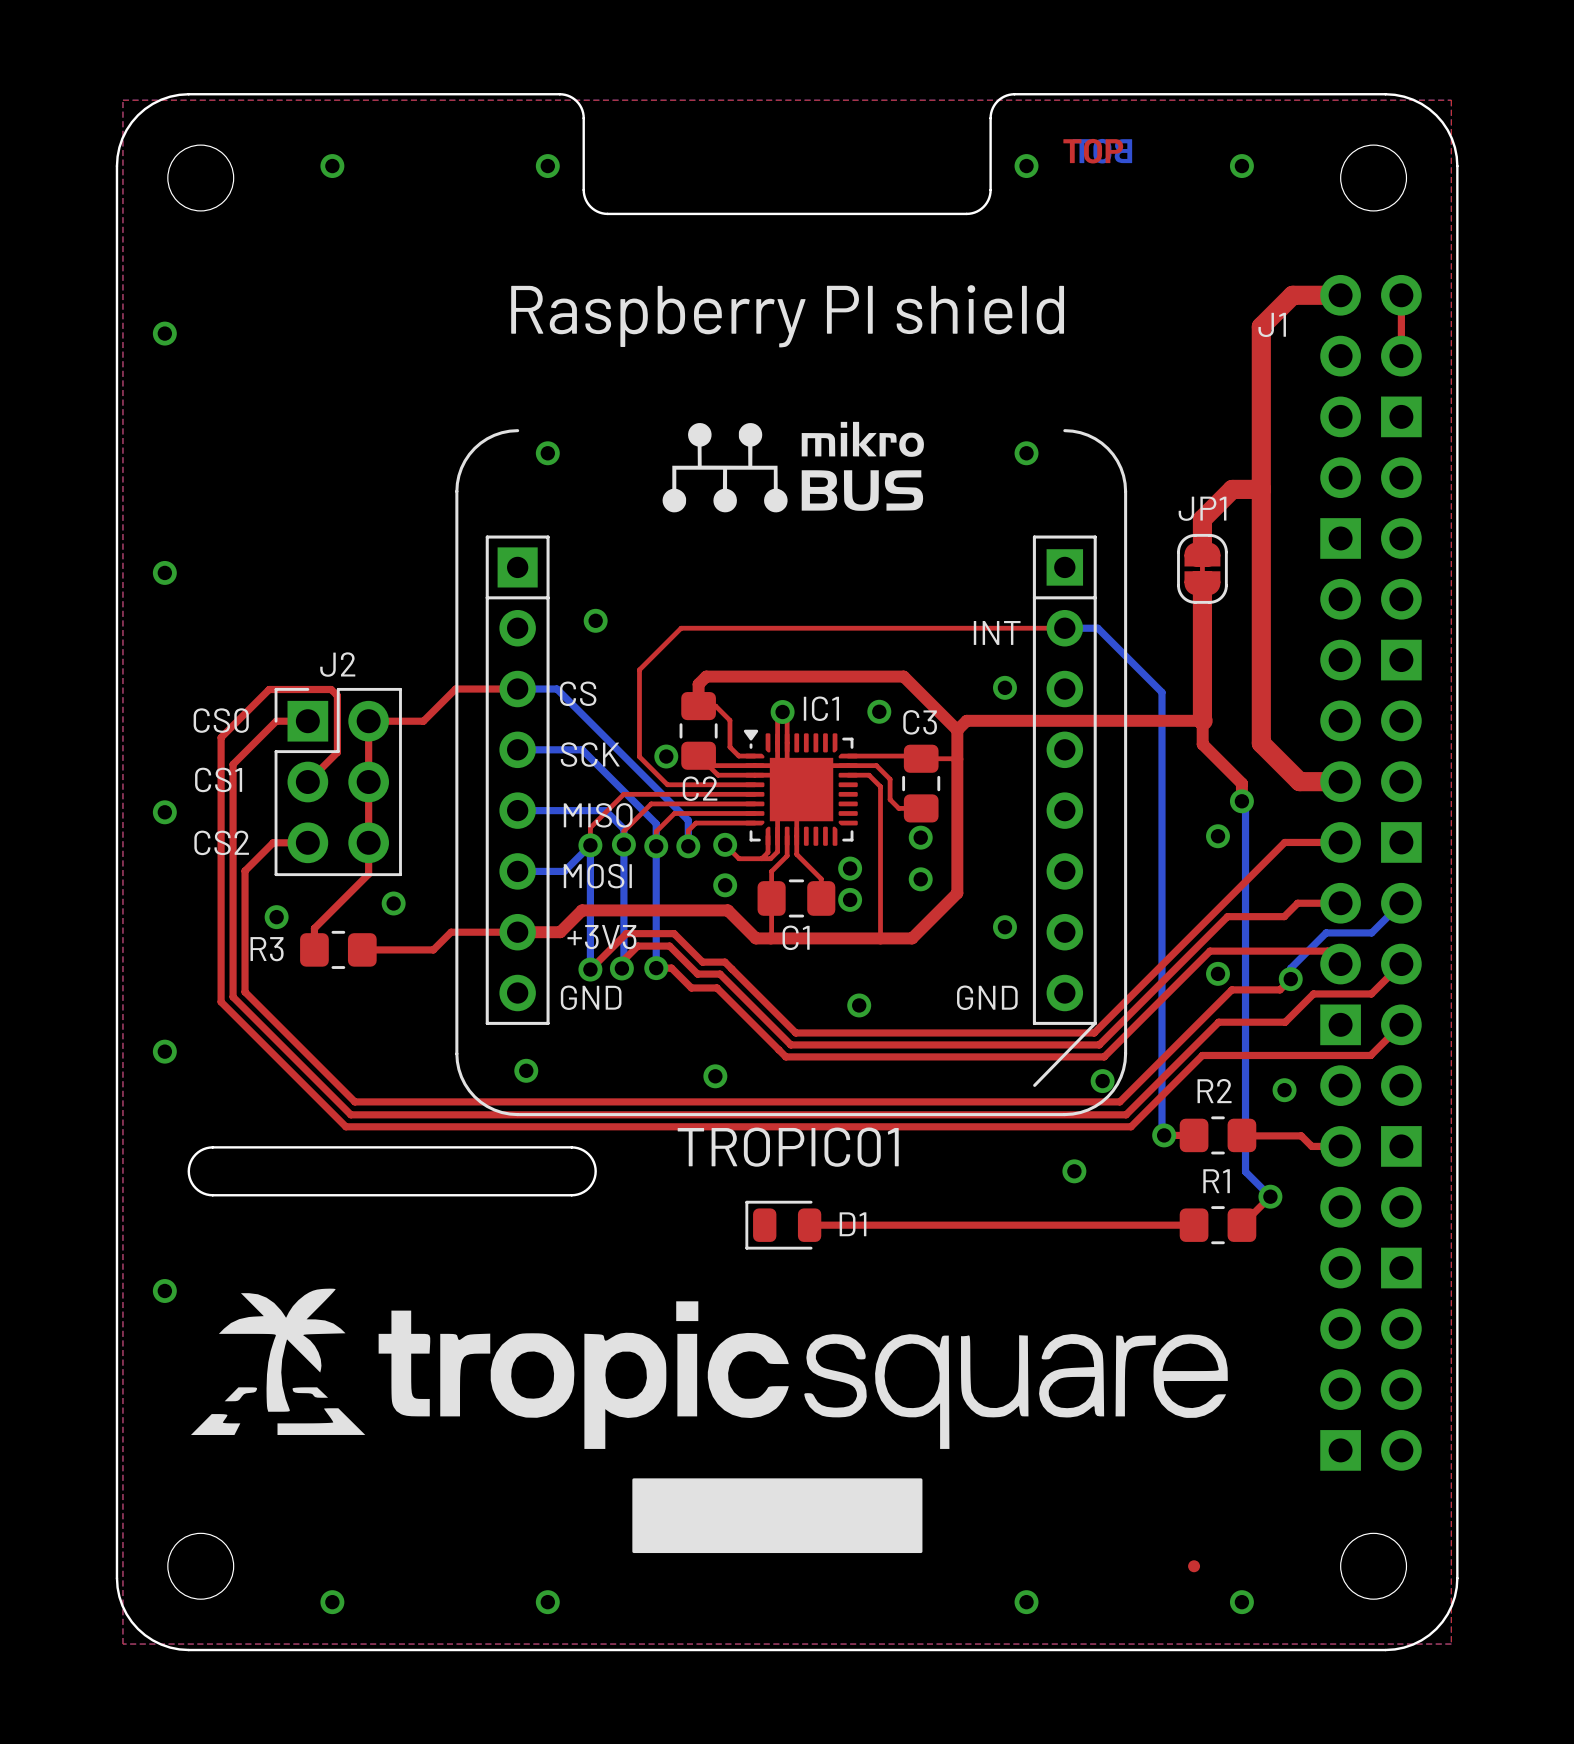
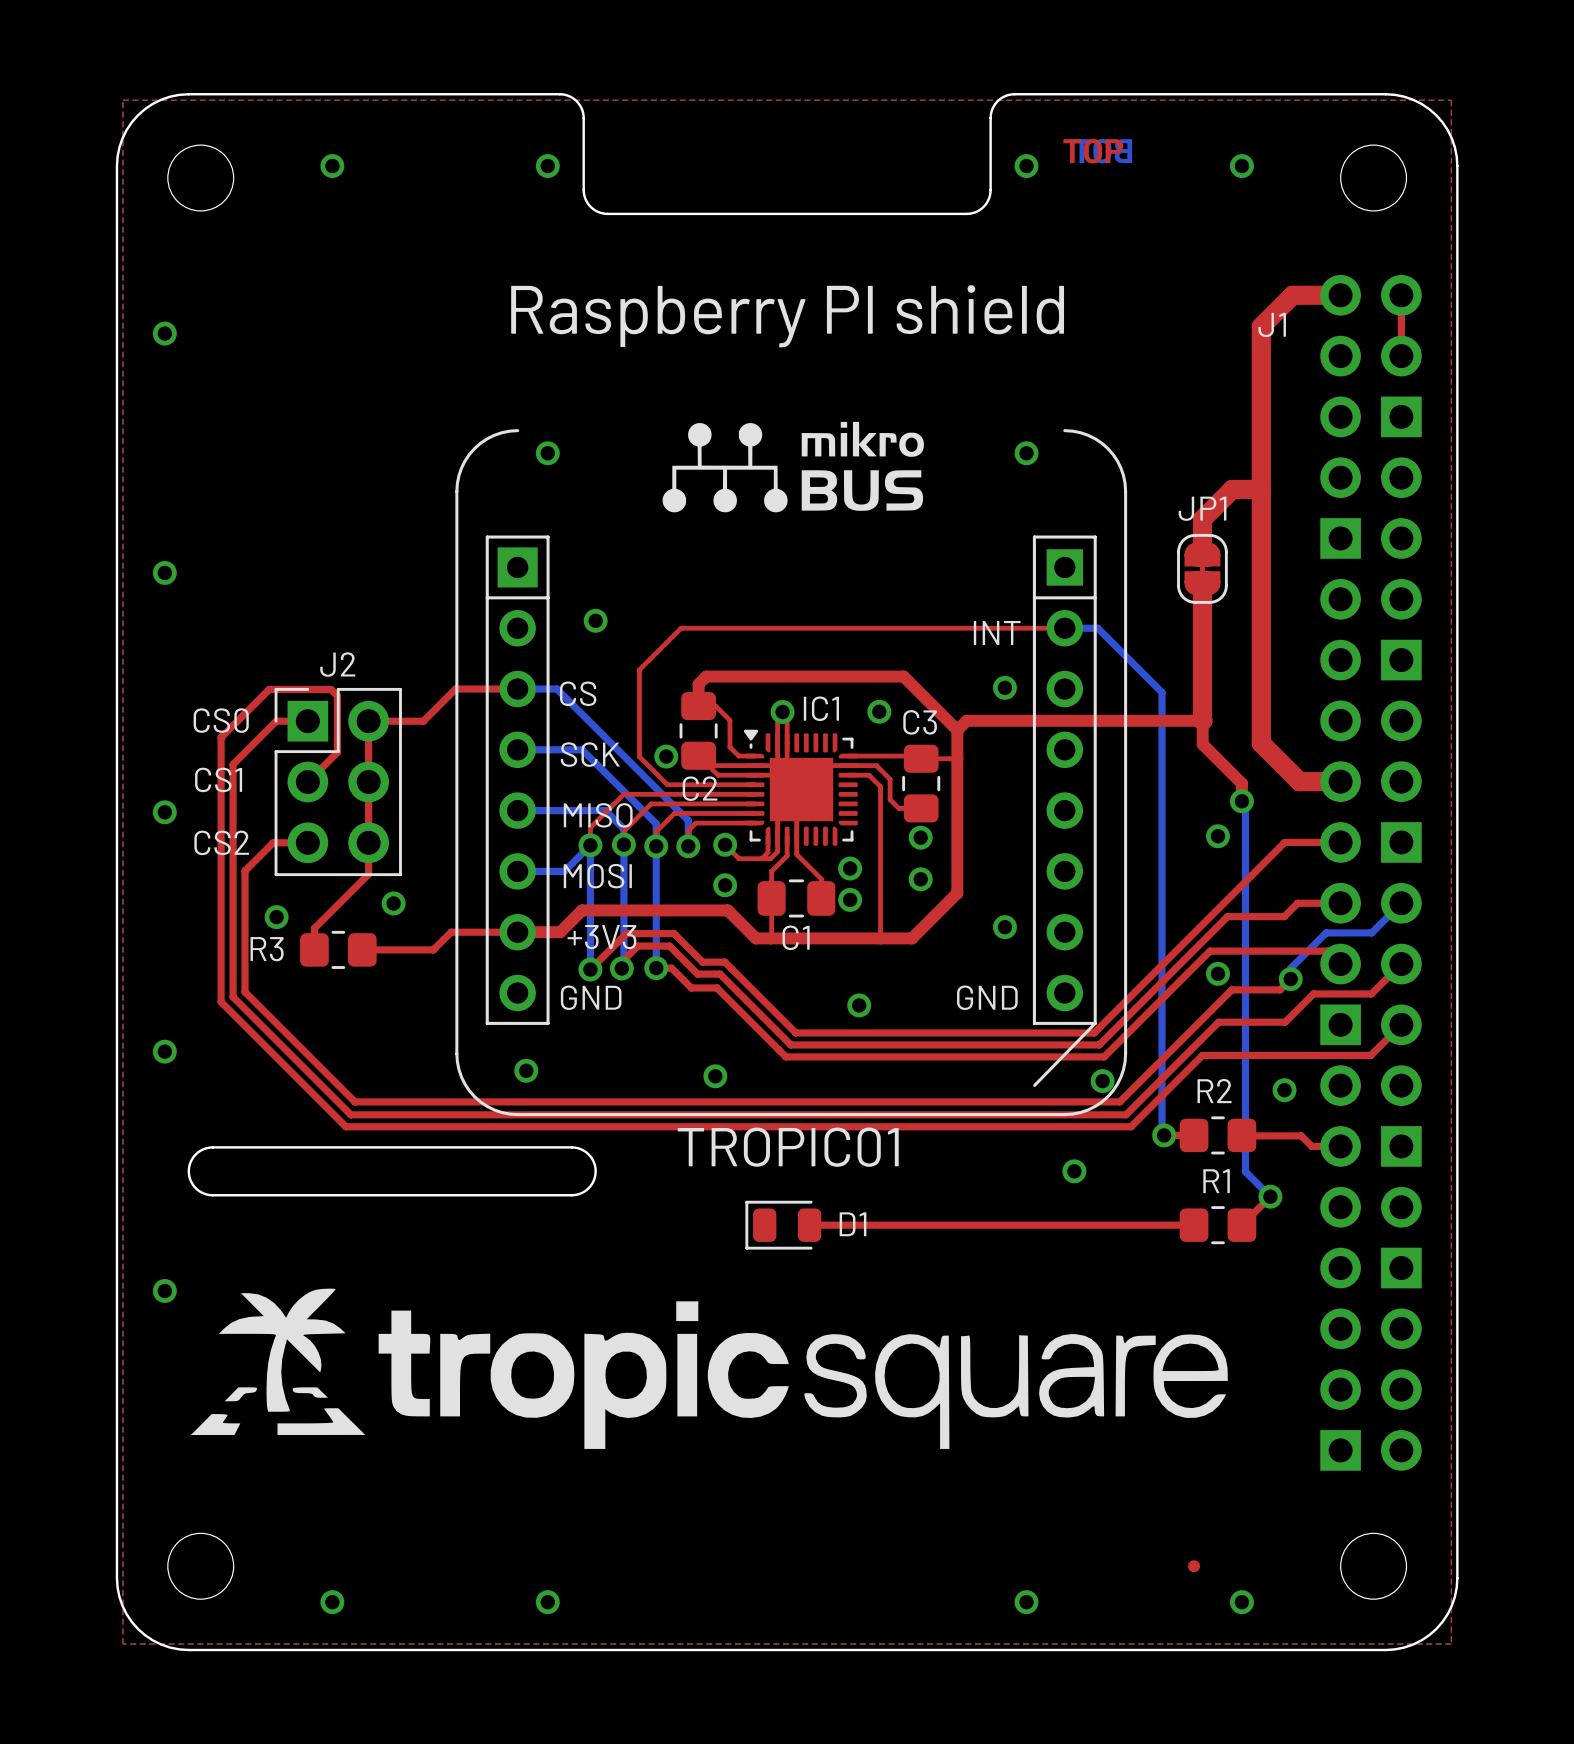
drawing: [632, 1478, 923, 1554] -> none

